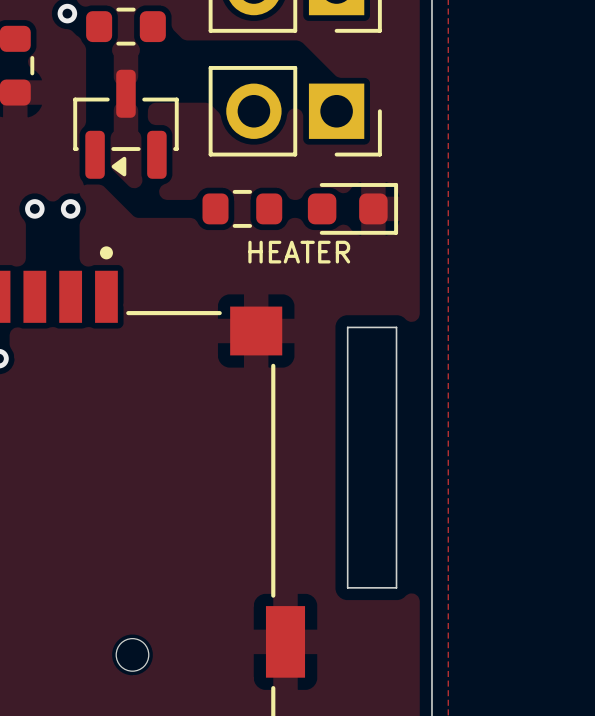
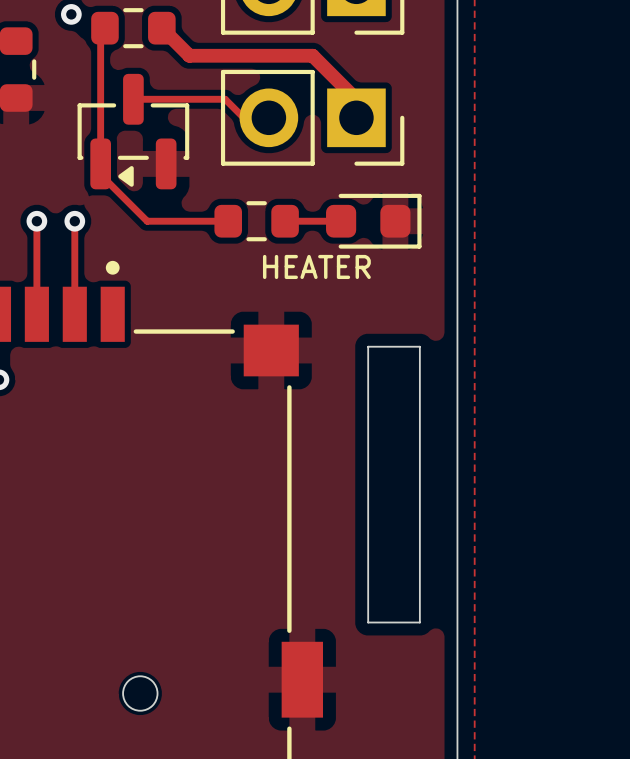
track: none -> (104, 28) (100, 32) (100, 174) (147, 221) (228, 221)
track: none -> (161, 28) (189, 55) (312, 55) (356, 99) (356, 117)
track: none -> (133, 99) (225, 99) (243, 117) (268, 117)
track: none -> (36, 221) (36, 317)
track: none -> (74, 221) (74, 317)
track: none -> (285, 221) (341, 221)

